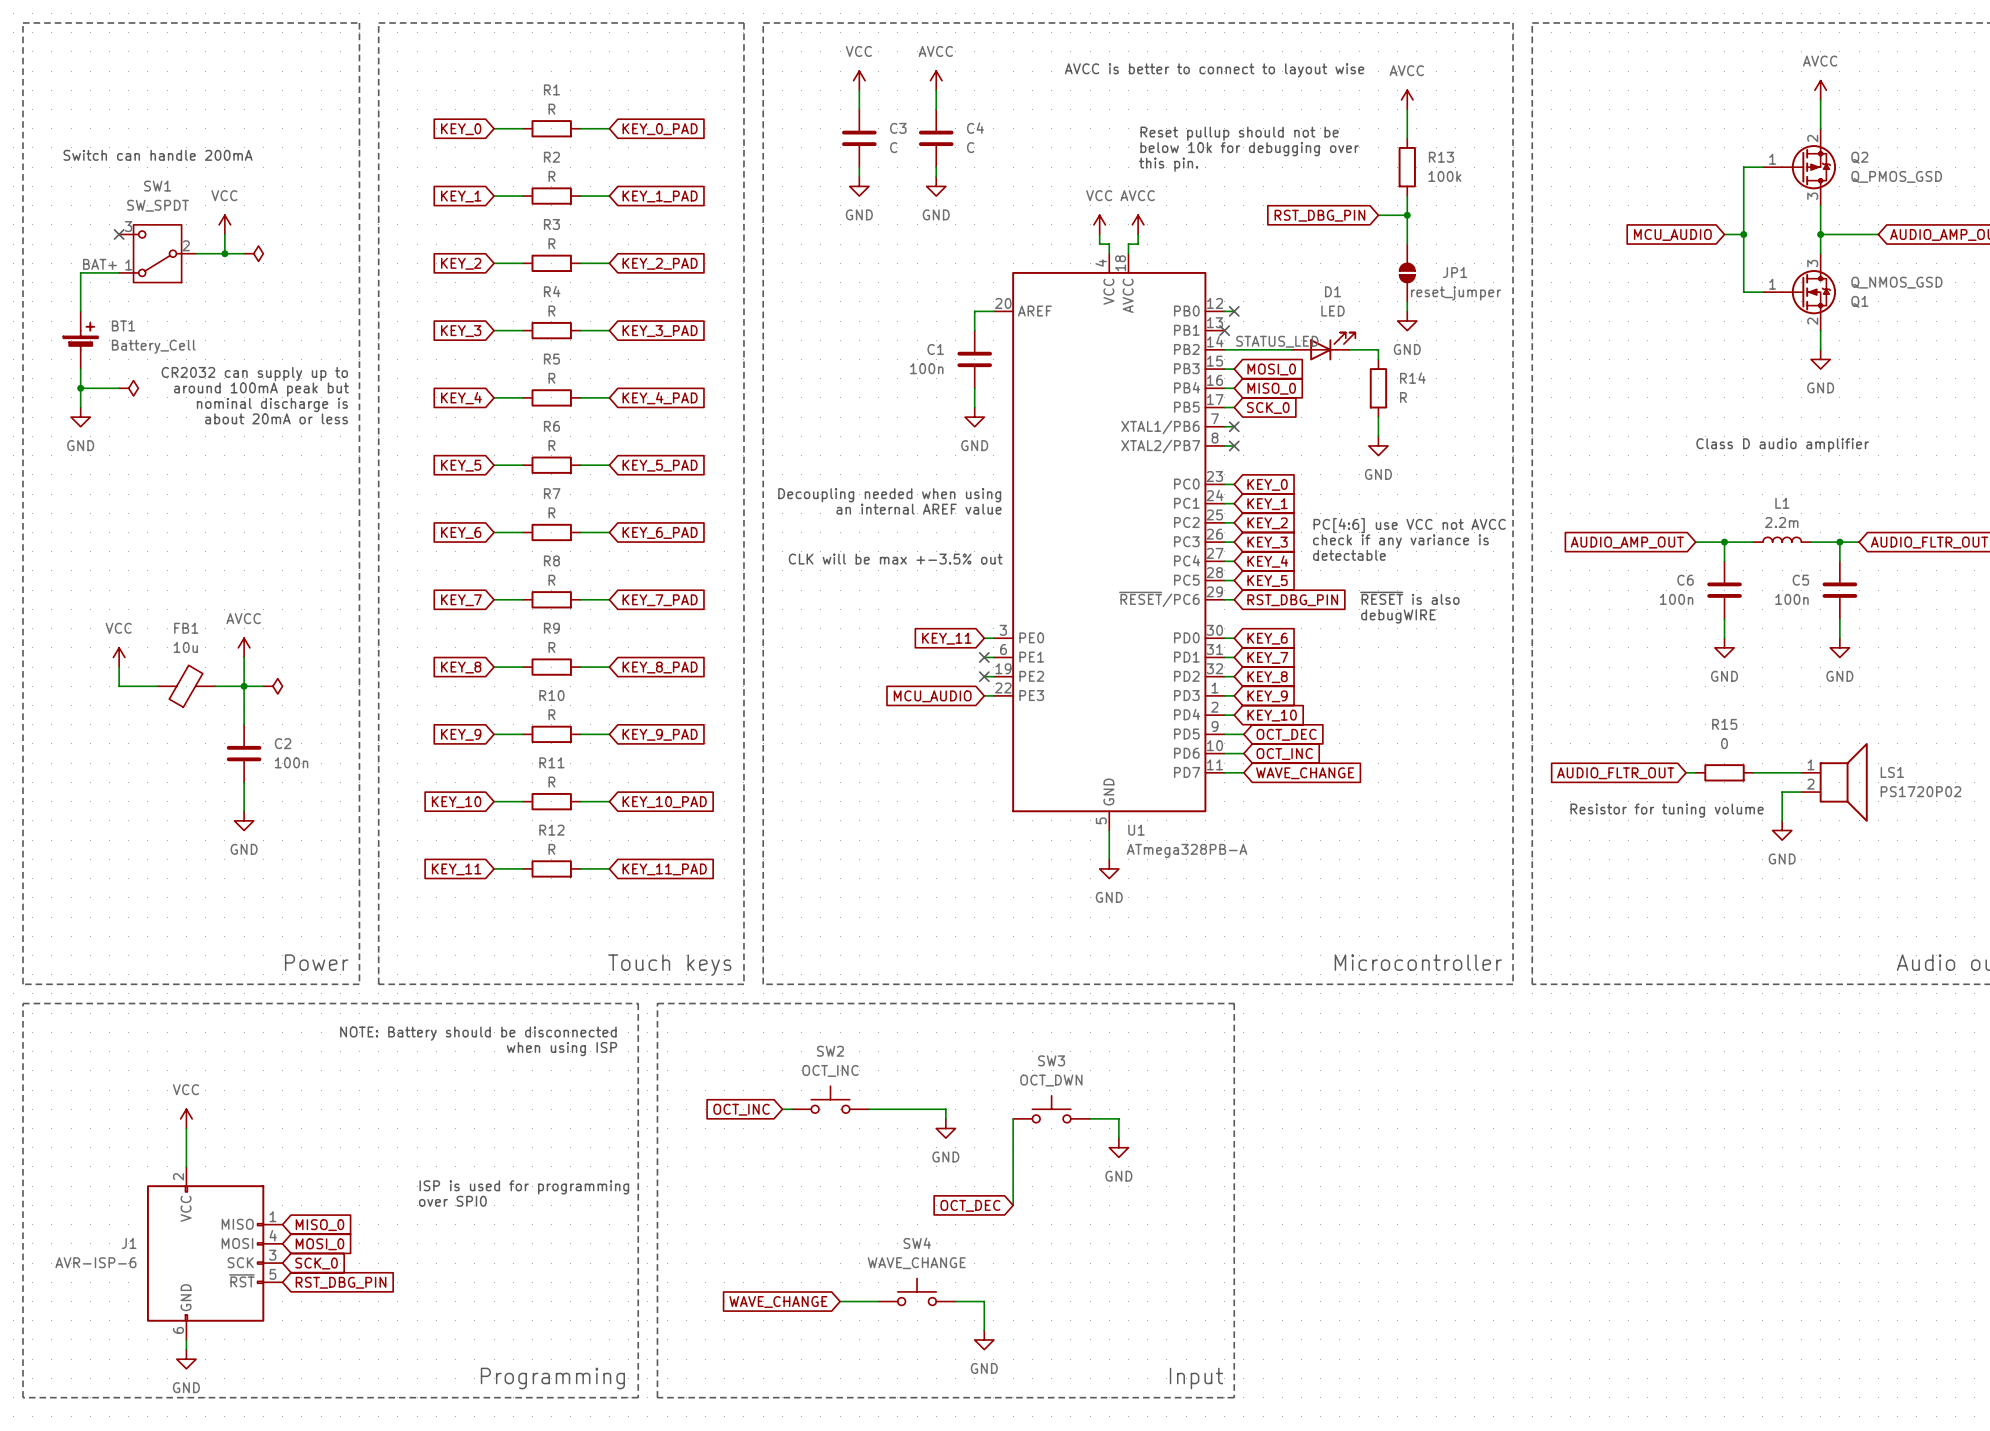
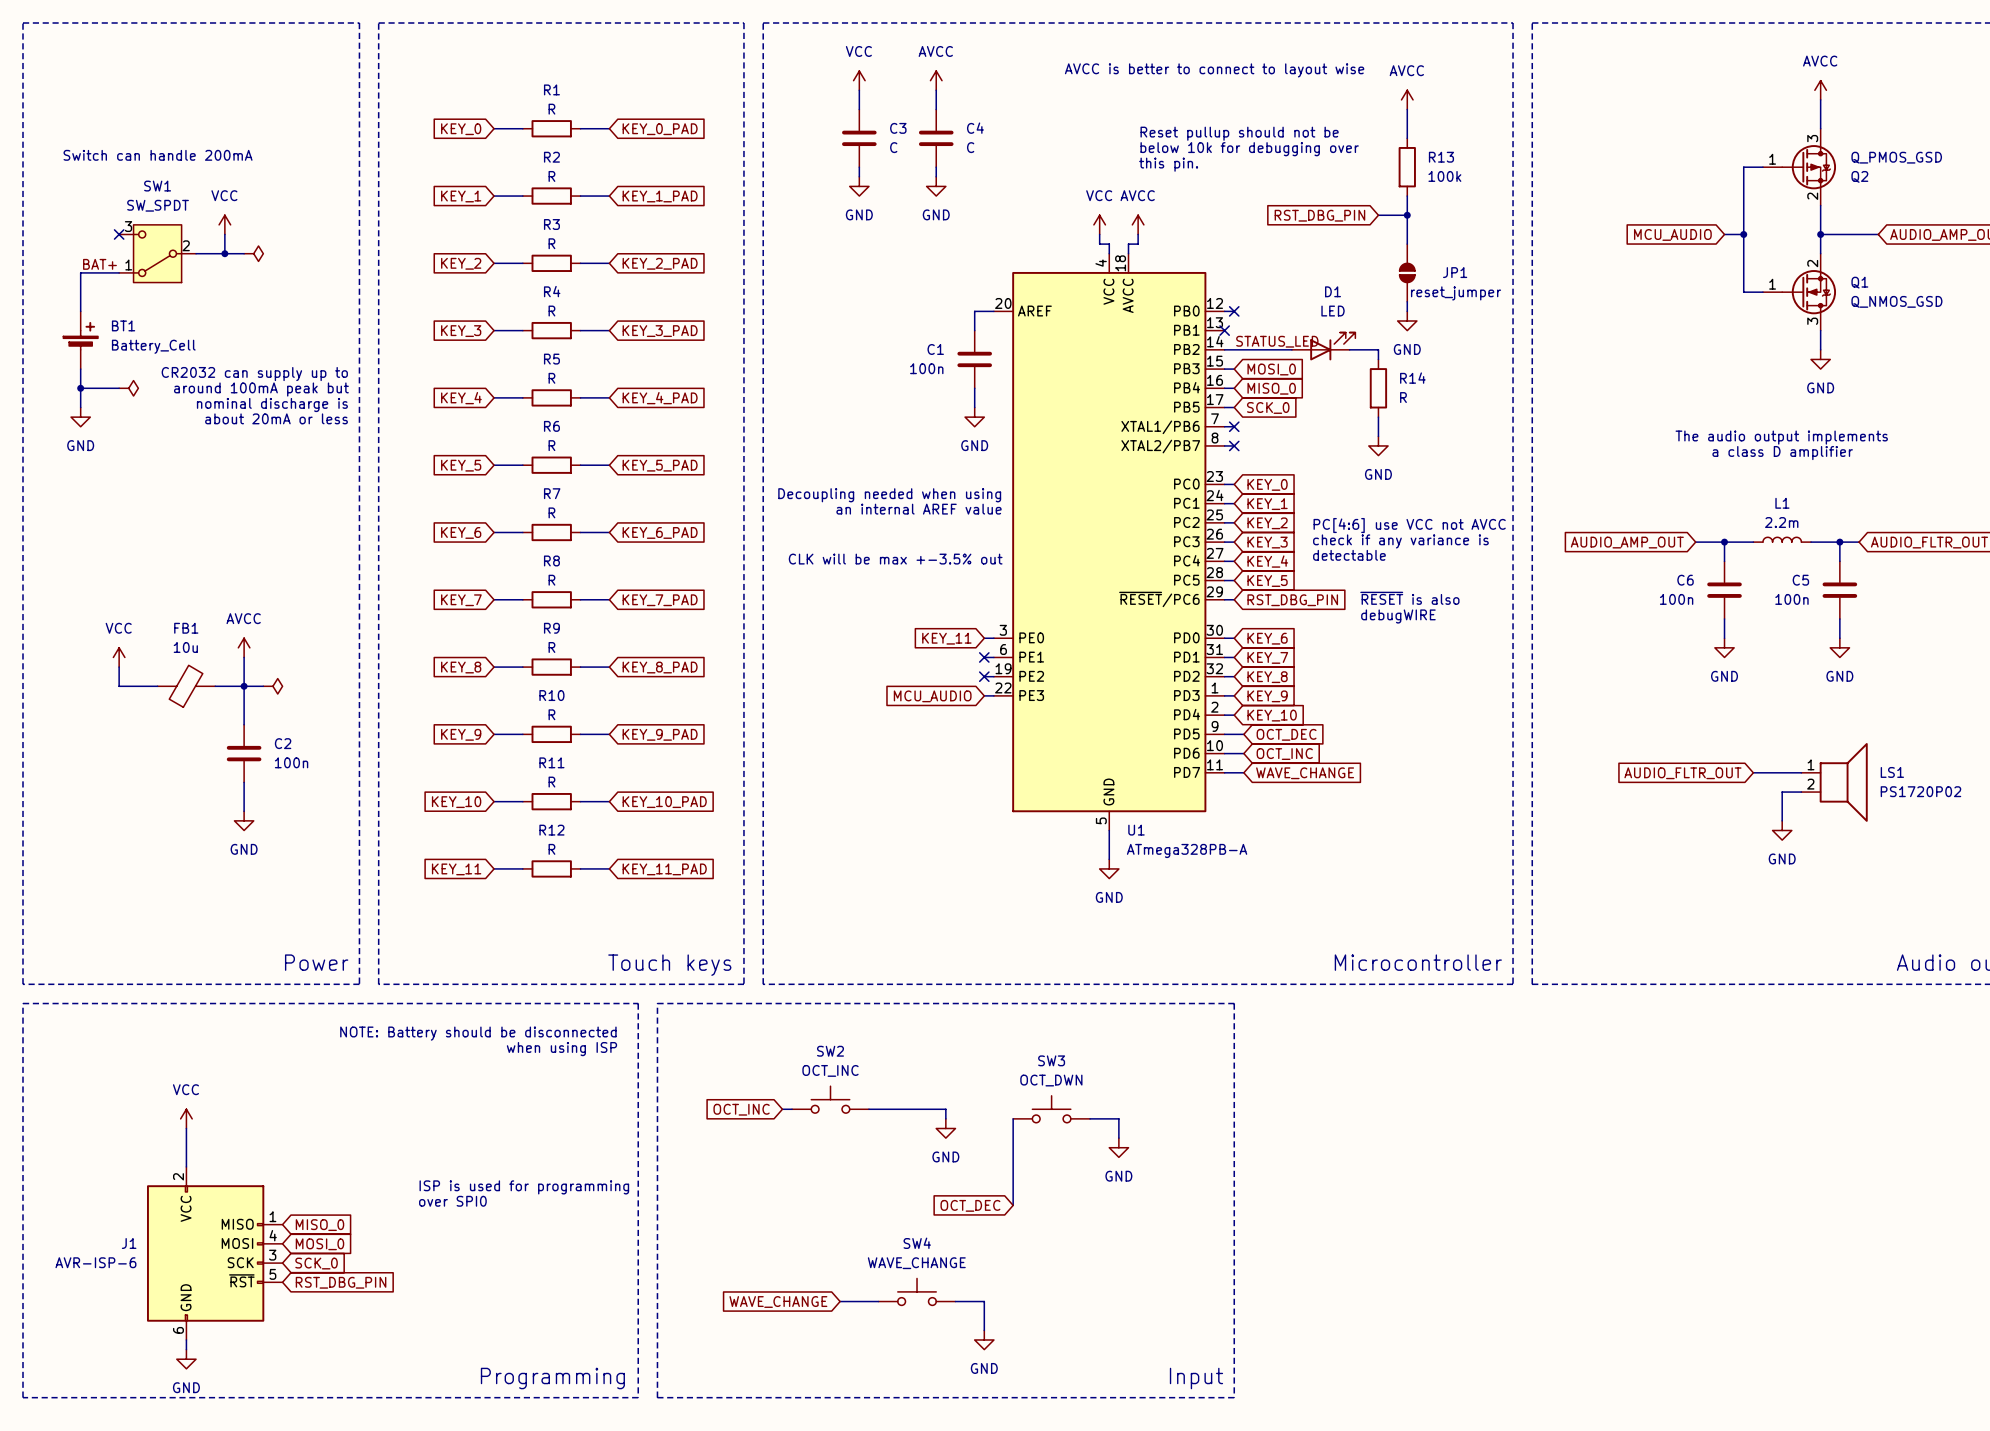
Q2 flip: as is (1809, 167) -> up-down (1809, 167)
Q1 flip: as is (1809, 292) -> up-down (1809, 292)
text: none -> The audio output implements (1781, 437)
text: Class D audio amplifier (1782, 445) -> a class D amplifier (1782, 453)
wire: (1686, 772) (1695, 772) -> none
R15: 0 (1724, 772) -> none
global label position: AUDIO_FLTR_OUT (1615, 773) -> AUDIO_FLTR_OUT (1682, 773)
text: Resistor for tuning volume (1667, 810) -> none

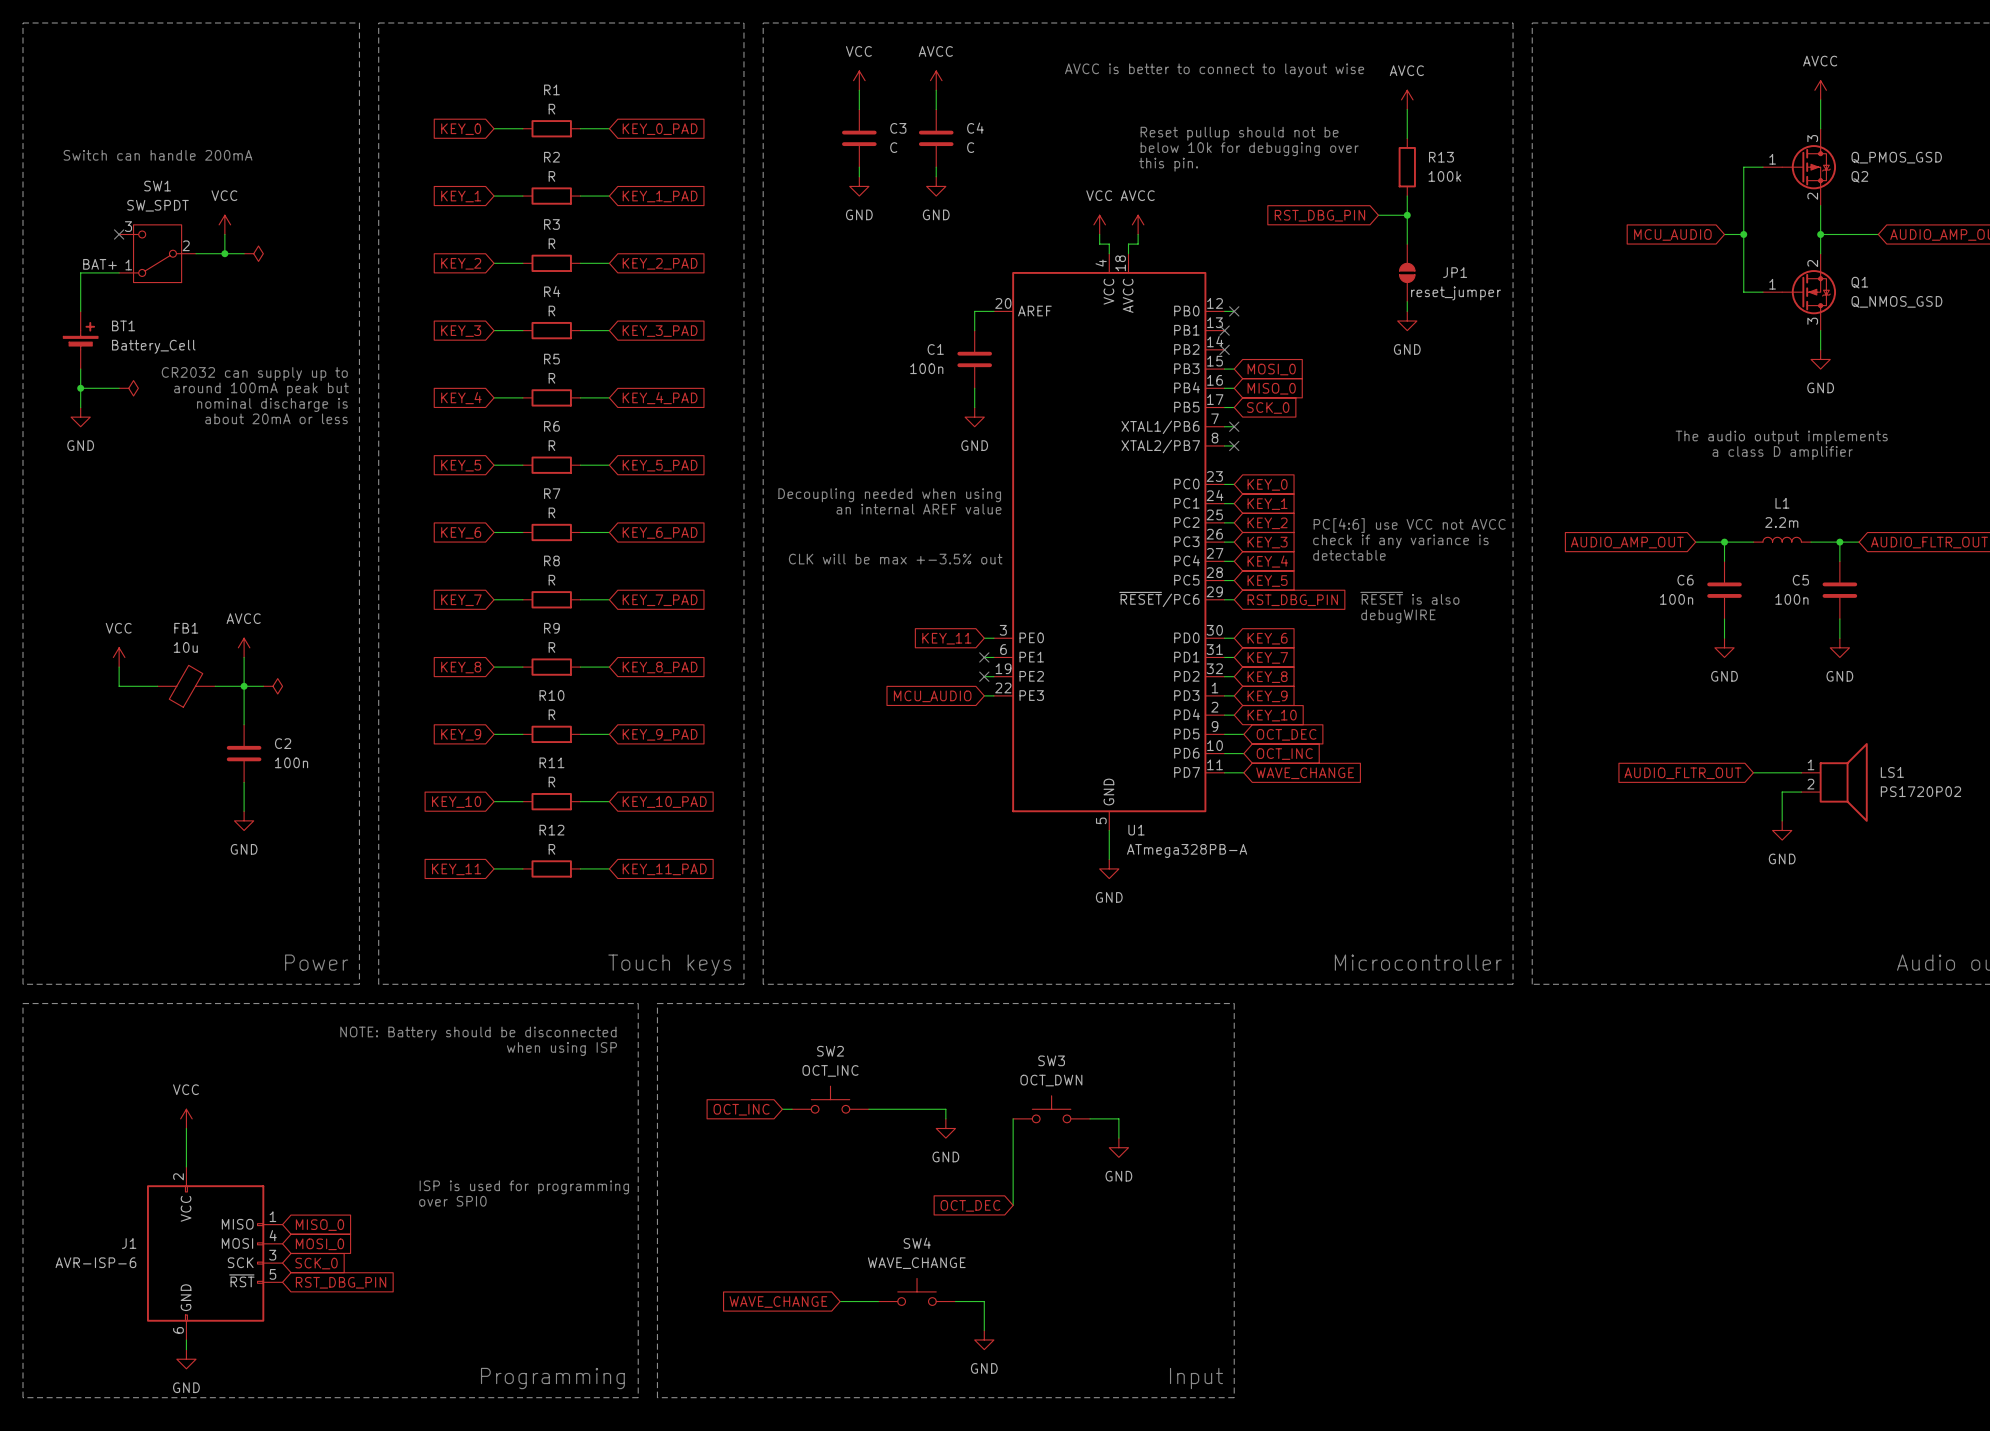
label: STATUS_LED (1277, 341) -> none
D1: LED (1323, 346) -> none
wire: (1224, 349) (1291, 349) -> none
no-connect mark: none -> (1224, 349)
wire: (1349, 349) (1378, 349) (1378, 359) -> none
R14: R (1378, 388) -> none
wire: (1378, 417) (1378, 436) -> none
power symbol: GND (1378, 445) -> none

